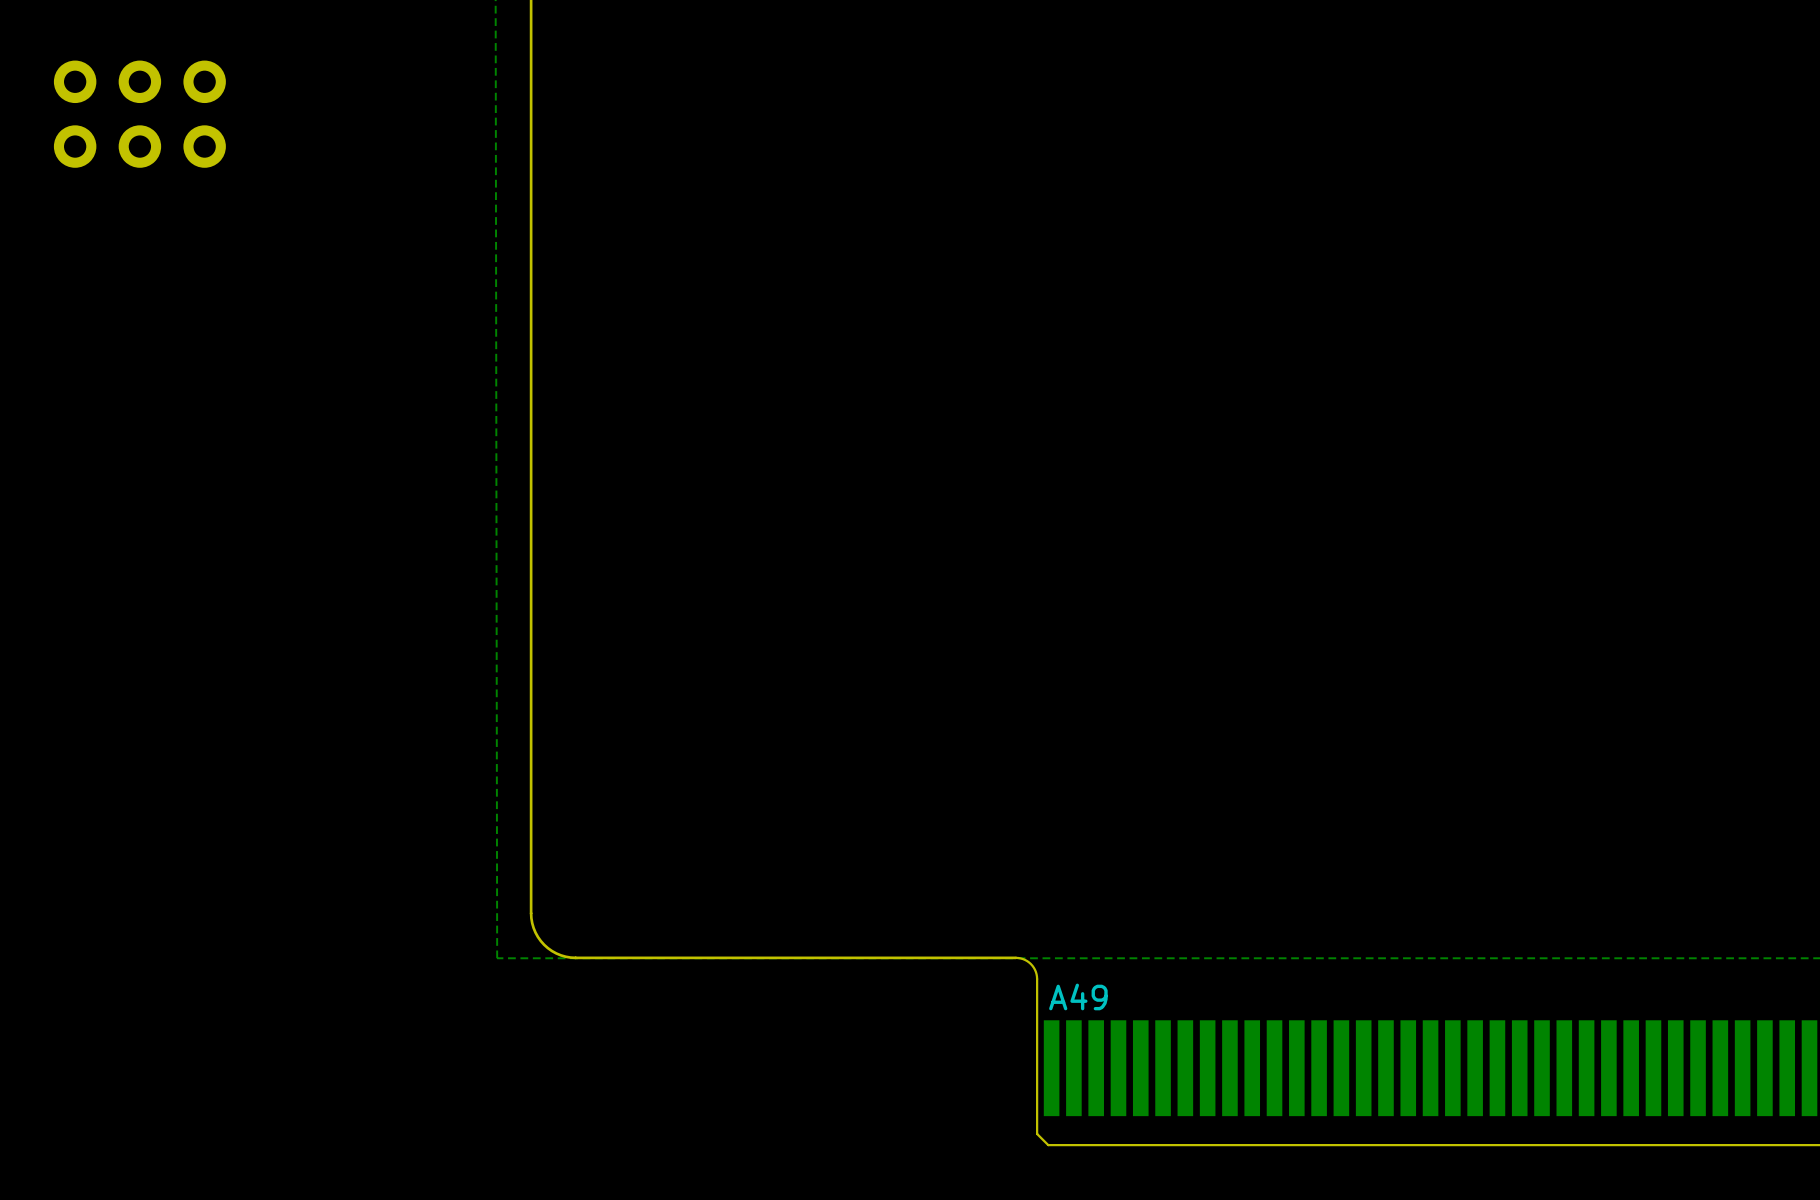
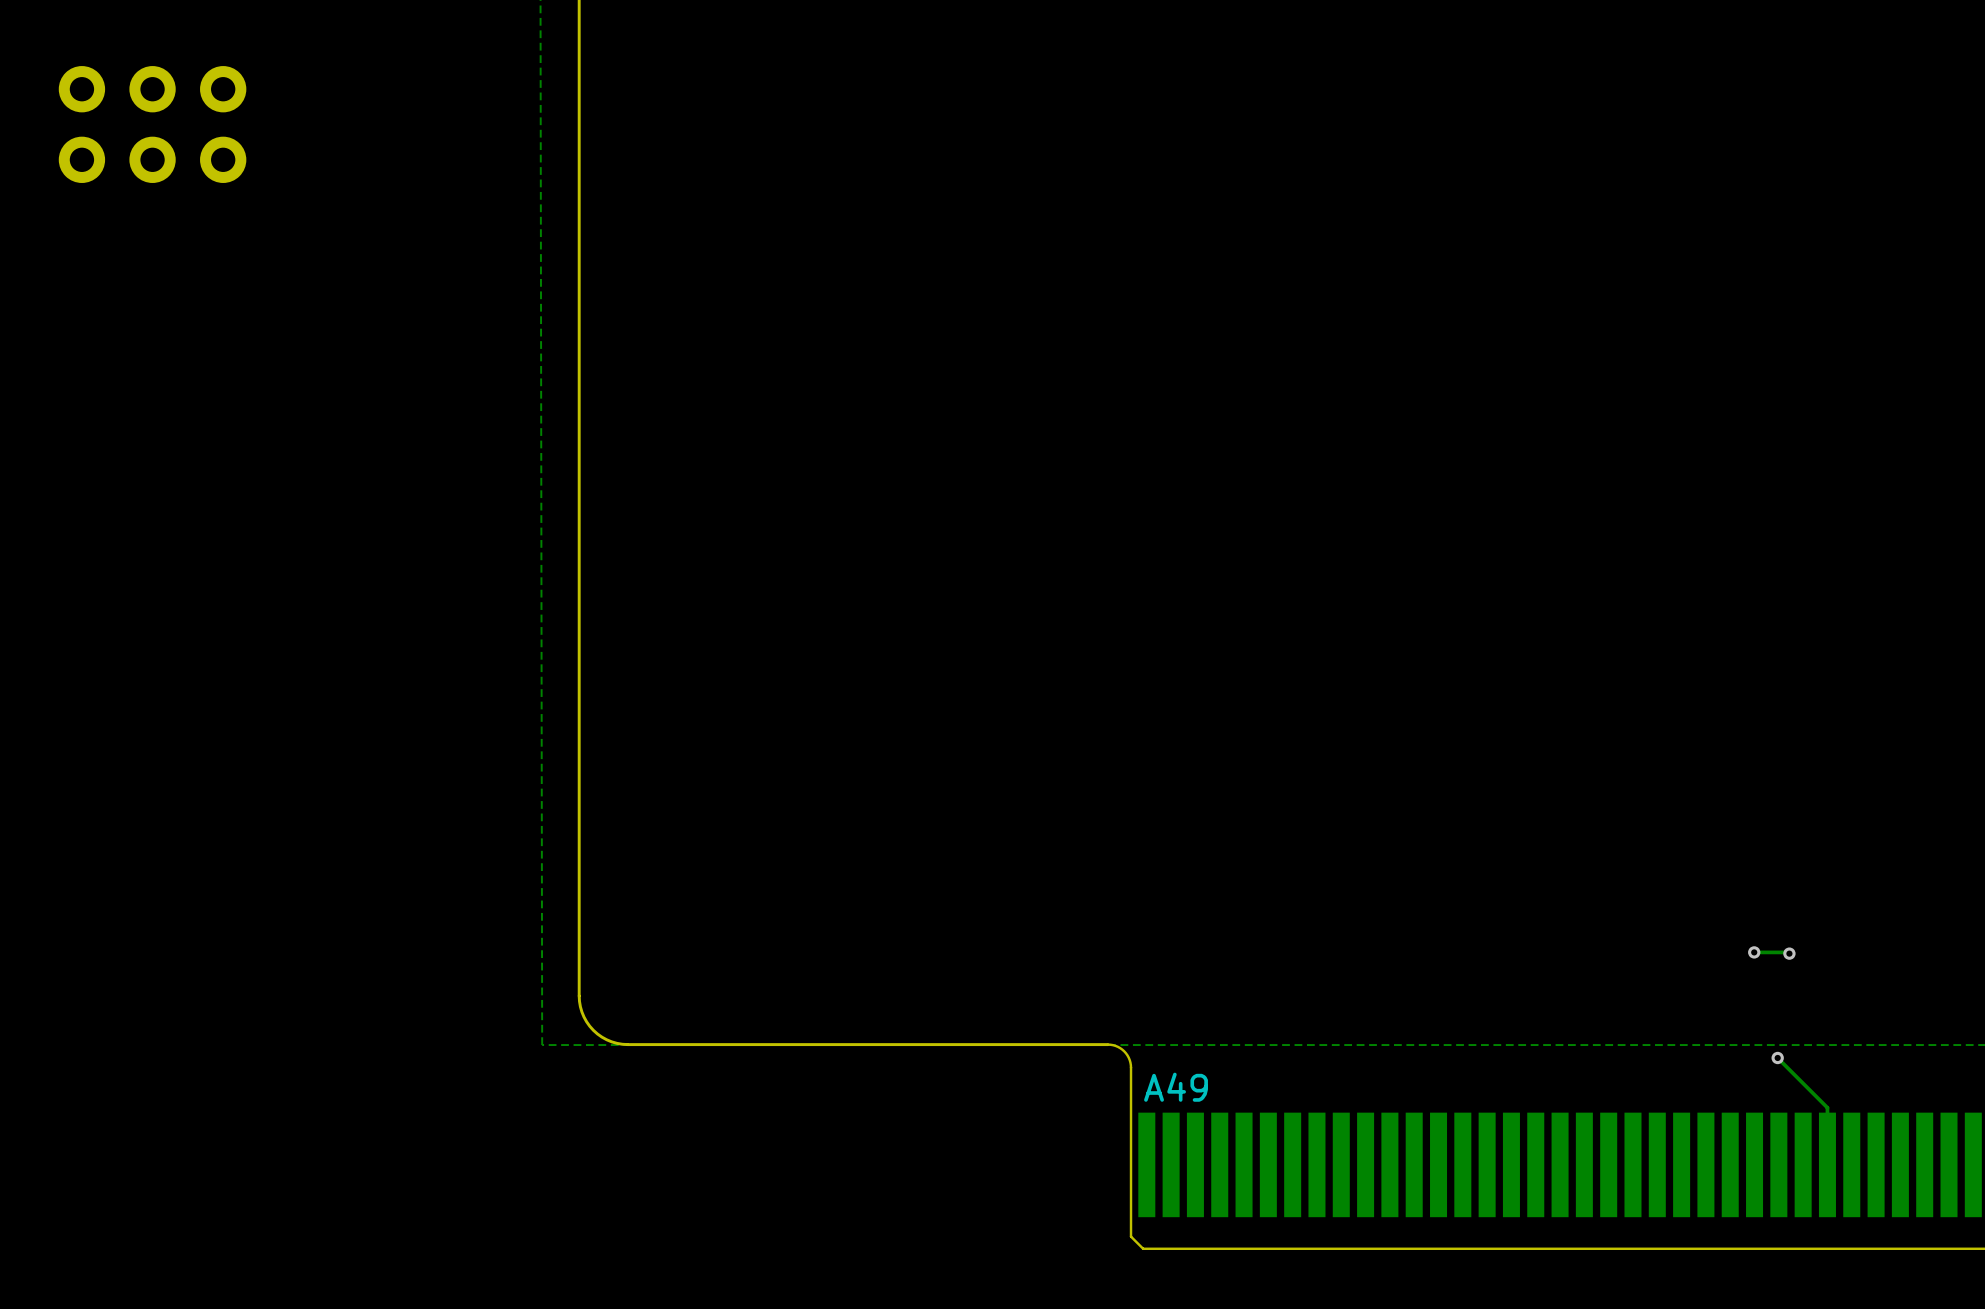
track: none -> (1754, 952) (1789, 953)
via: none -> (1754, 952)
via: none -> (1789, 953)
track: none -> (1777, 1057) (1827, 1107) (1827, 1164)
via: none -> (1777, 1057)

